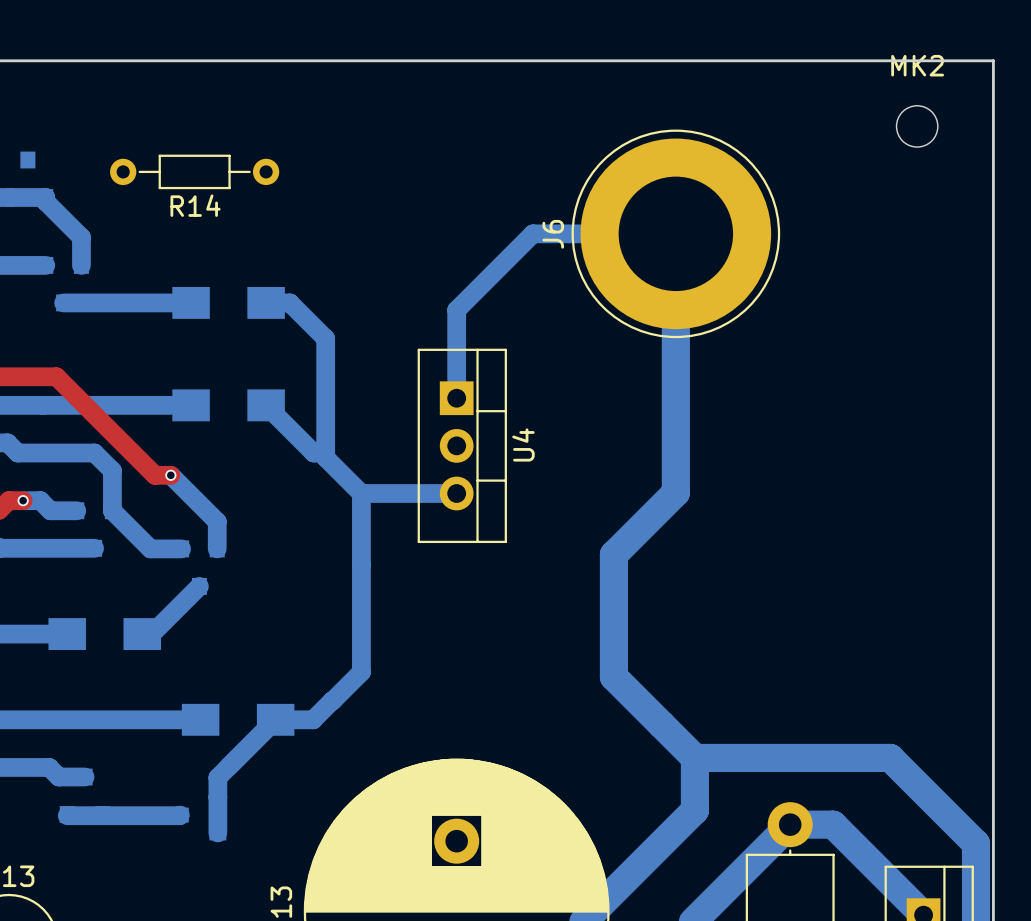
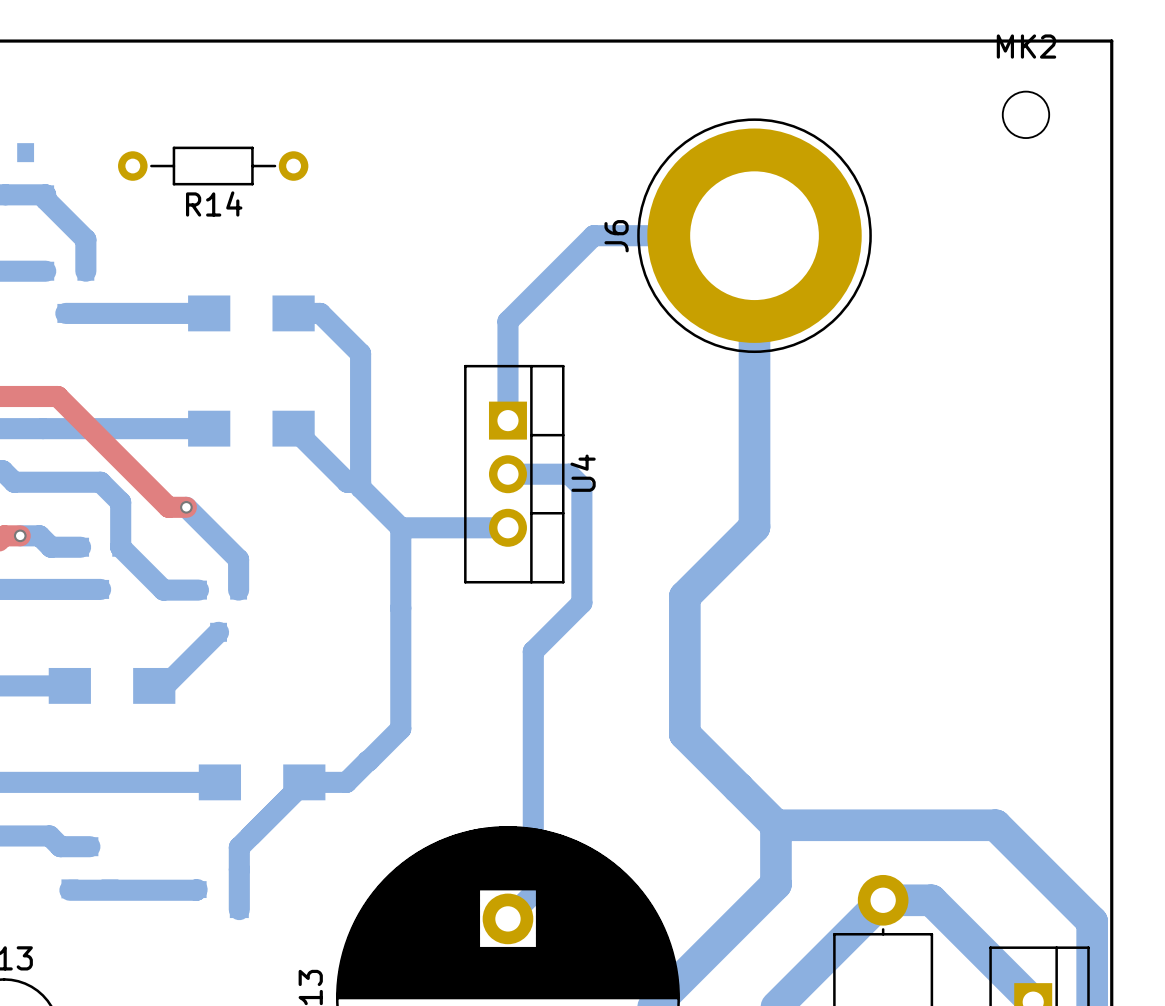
bottom track: none -> (507, 474) (569, 474) (581, 486) (581, 602) (533, 651) (533, 893) (507, 918)

